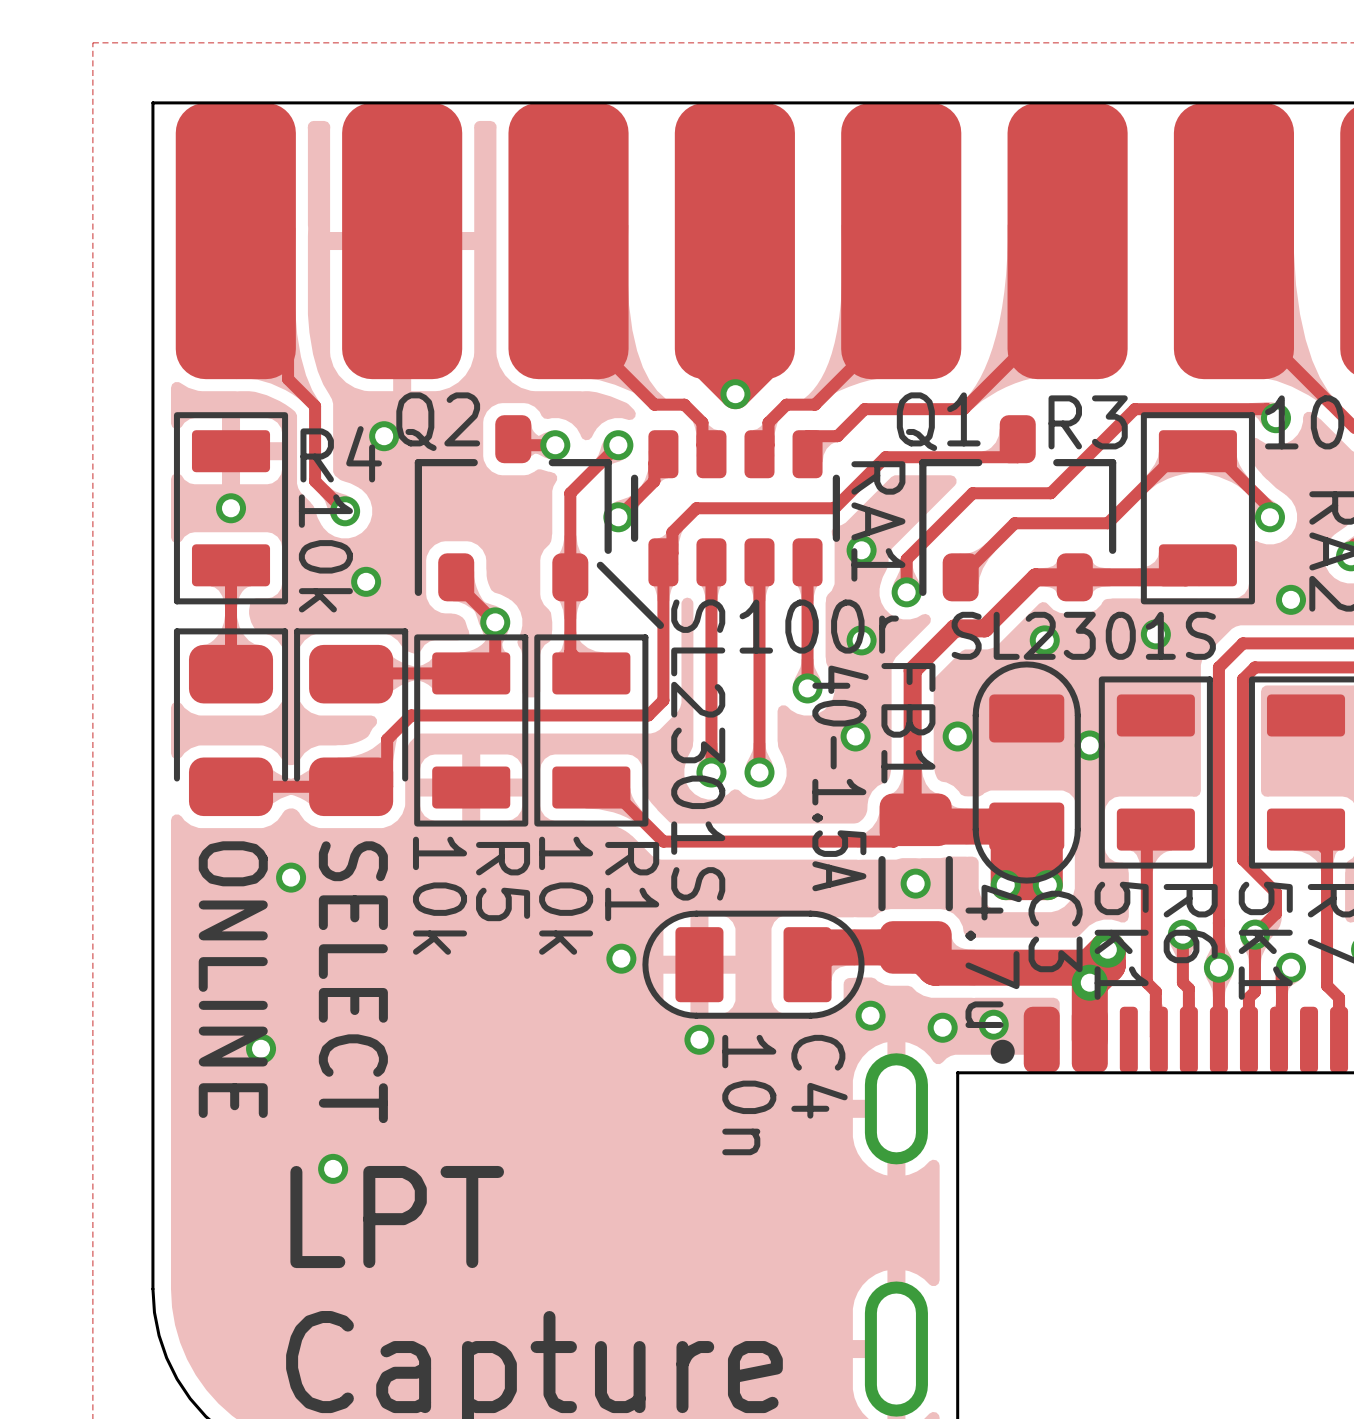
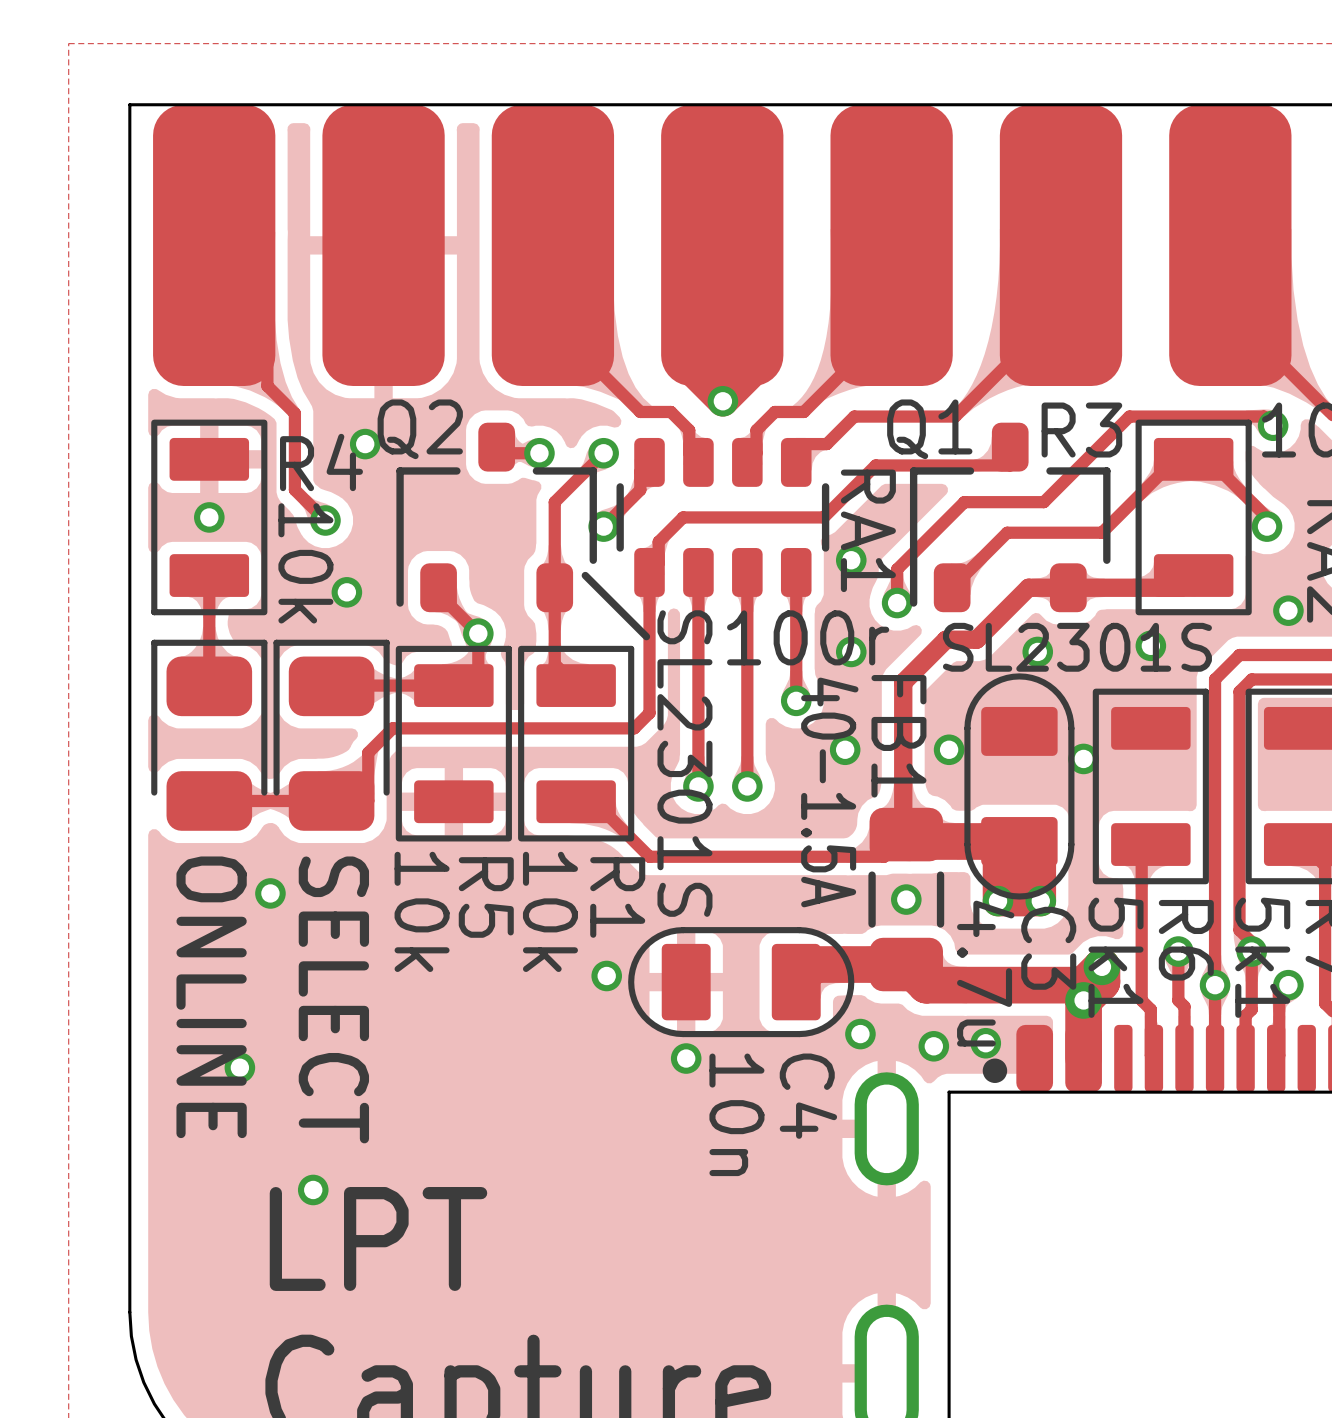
track: (1242, 859) (1275, 892) (1275, 913) (1254, 934) -> (1239, 875) (1239, 930) (1251, 942) (1251, 951)

